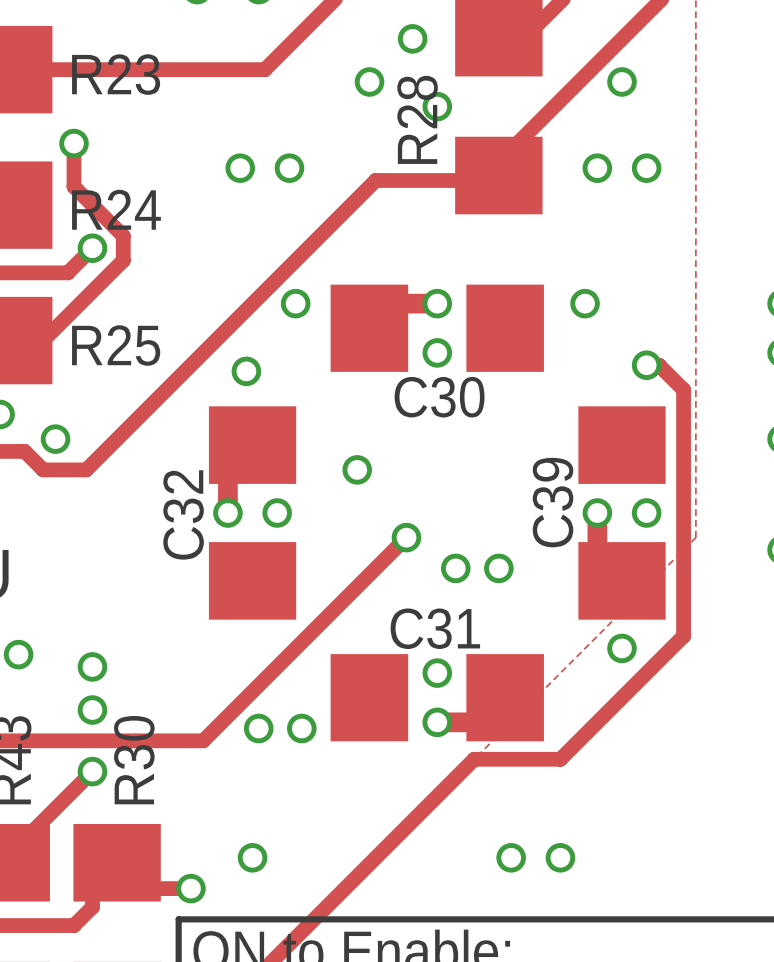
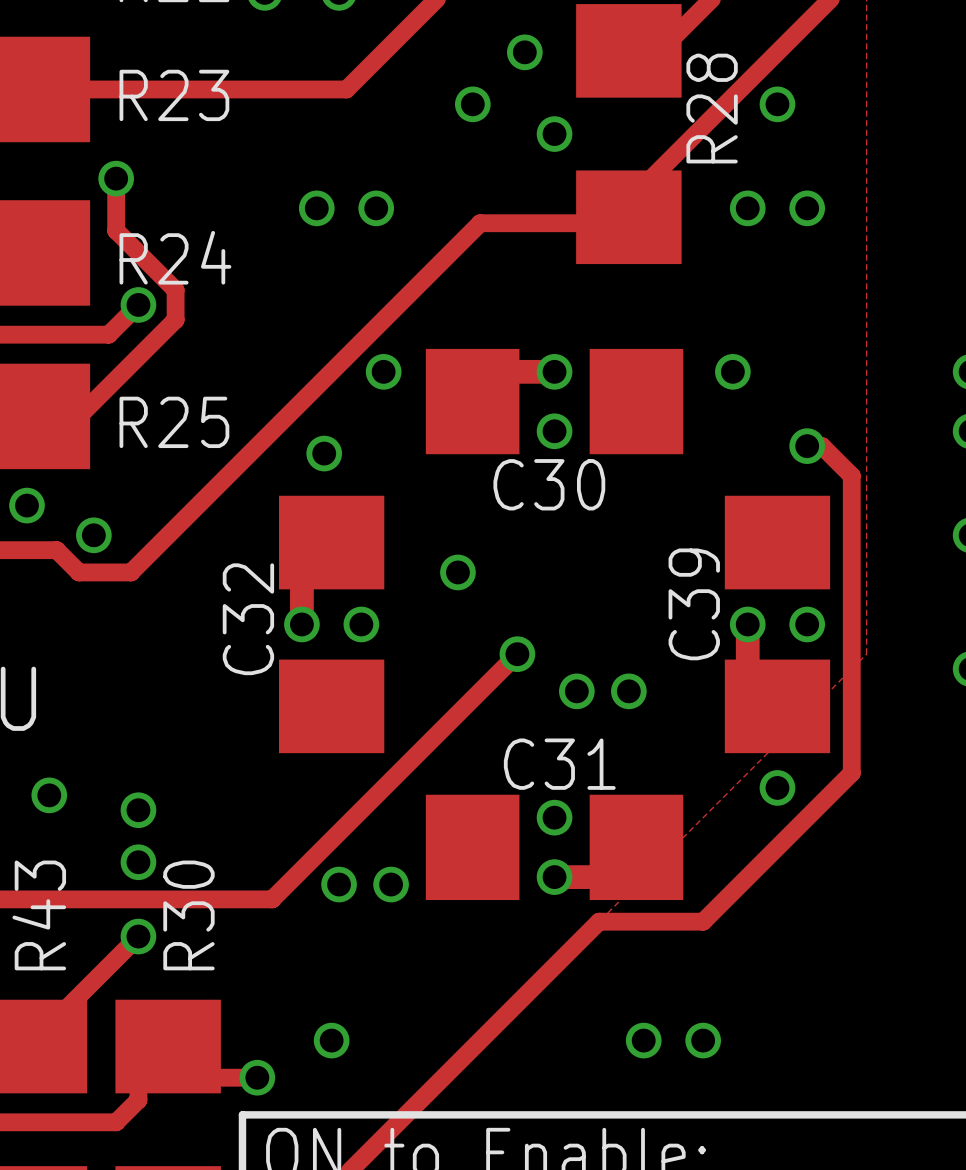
R28 name position: R28 (417, 119) -> R28 (712, 108)

